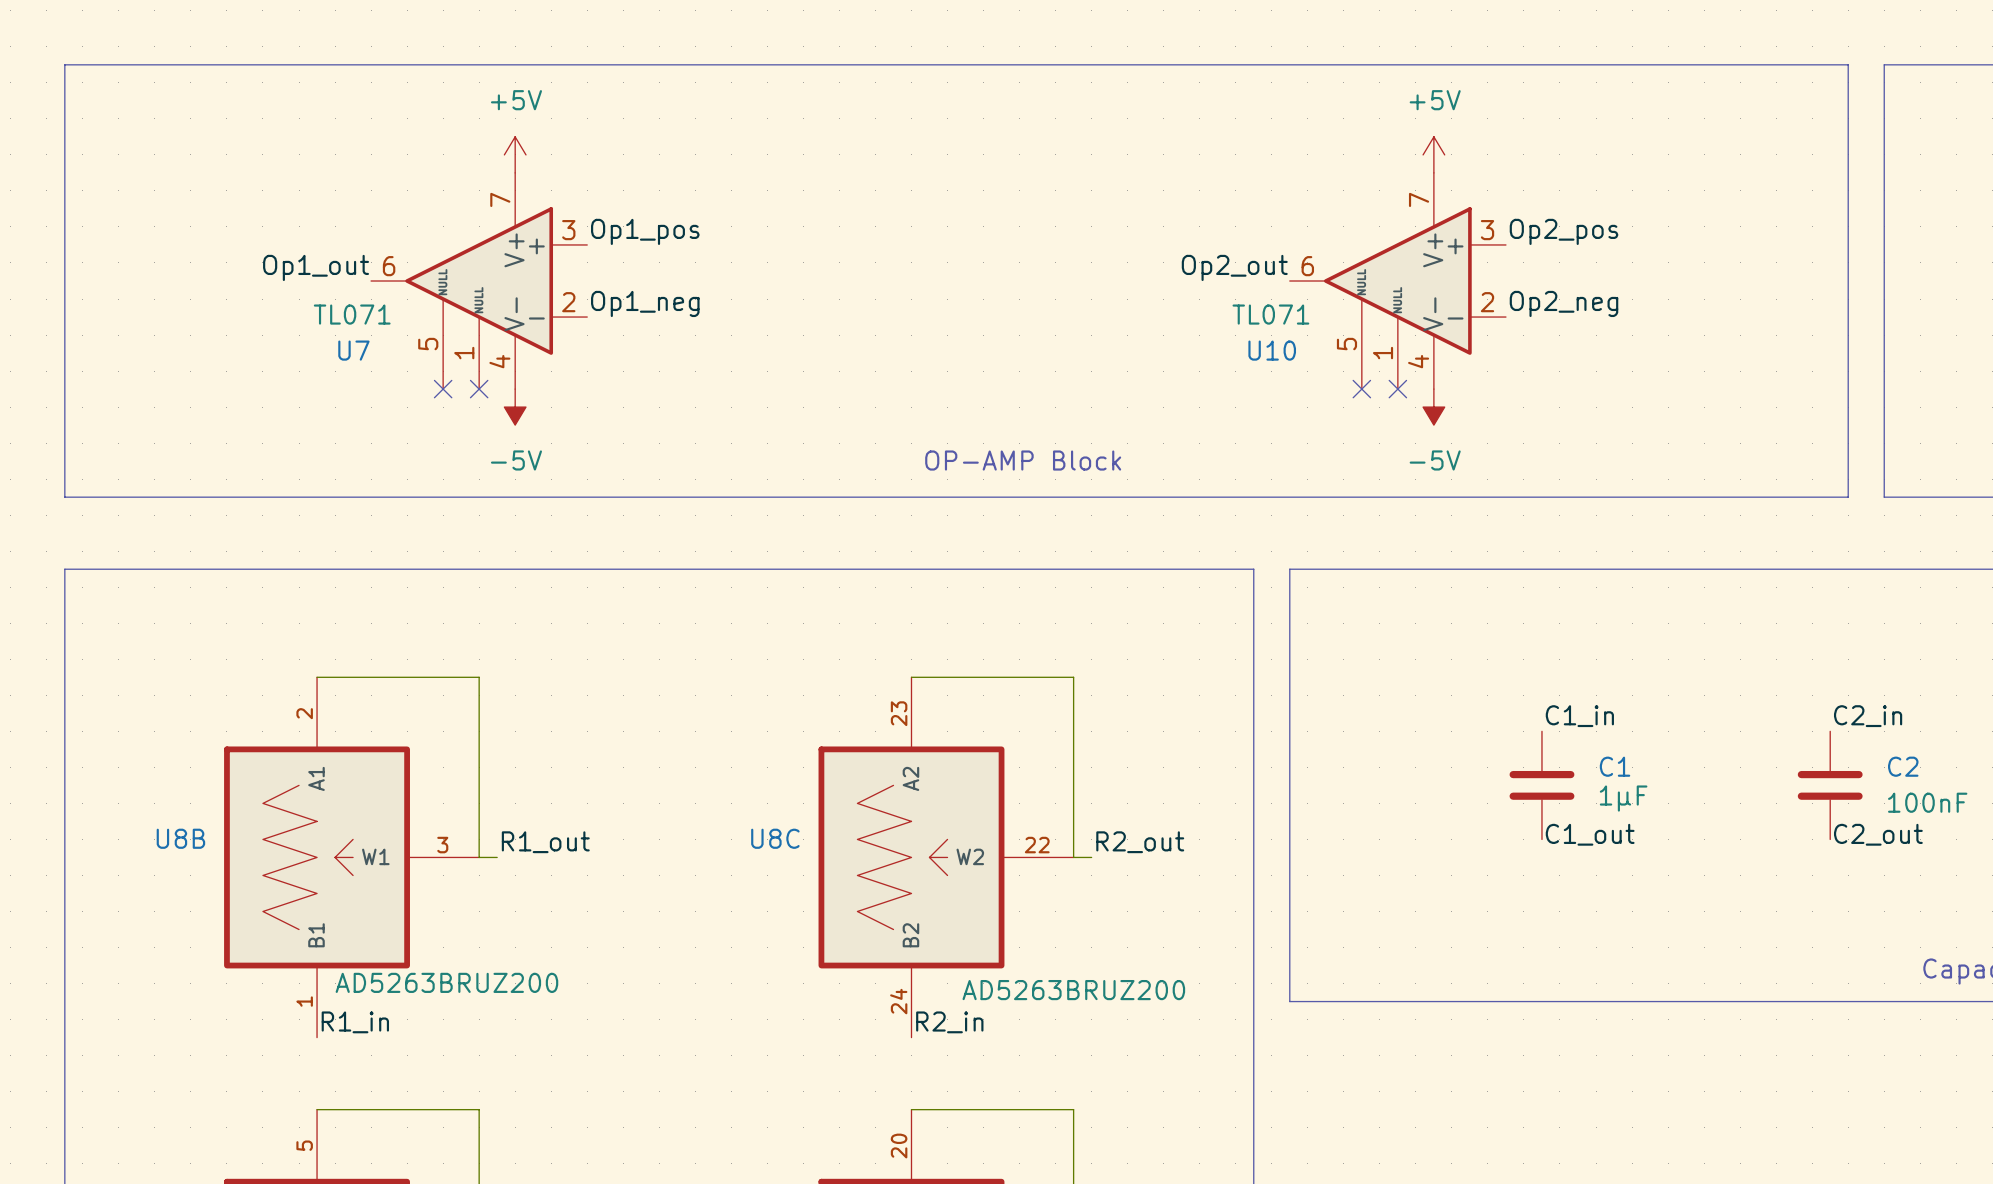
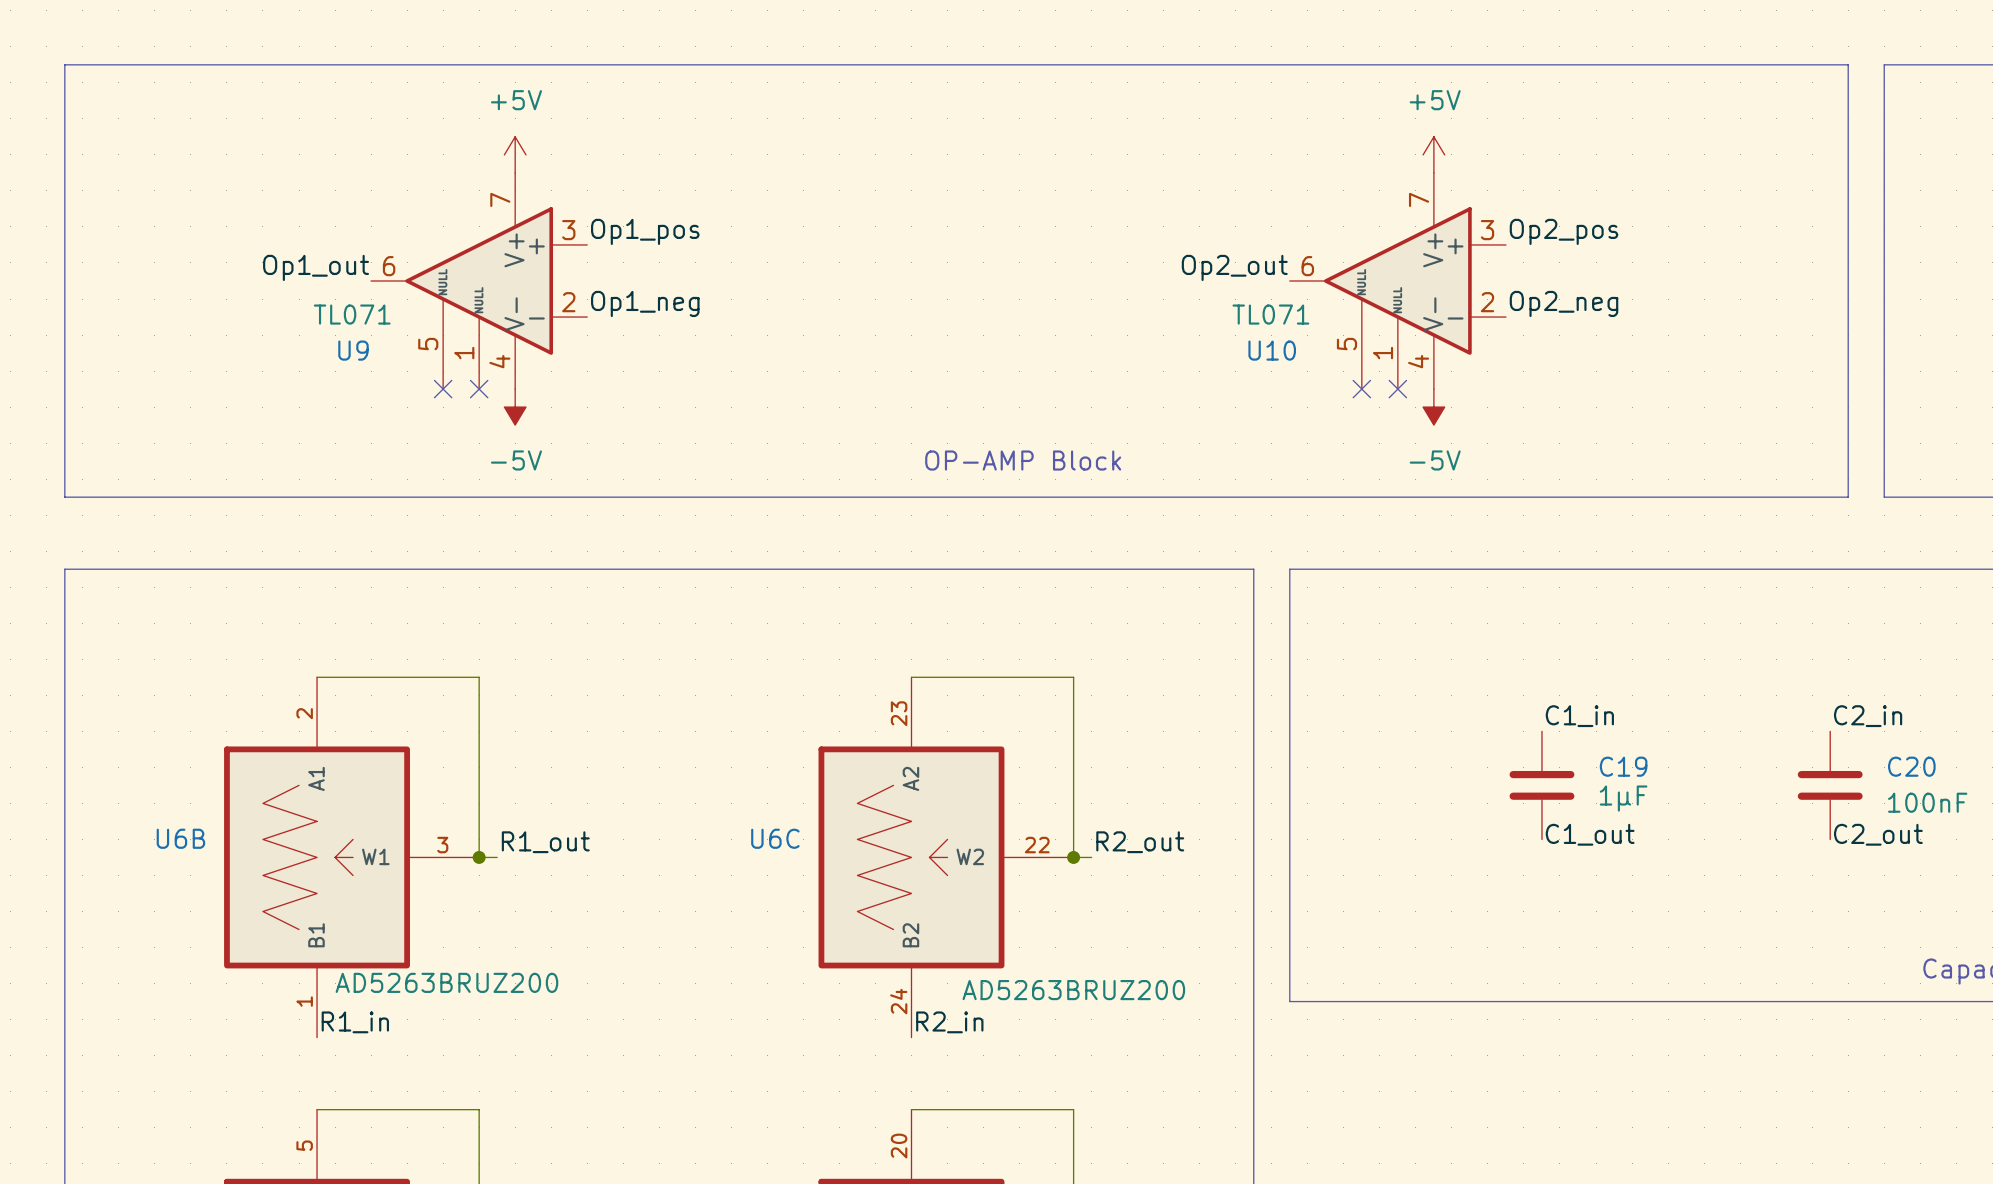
U7 name: U7 (353, 350) -> U9 (353, 350)
C1 name: C1 (1615, 766) -> C19 (1623, 766)
C2 name: C2 (1903, 766) -> C20 (1911, 766)
U8B name: U8B (180, 838) -> U6B (180, 838)
U8C name: U8C (775, 838) -> U6C (775, 838)
junction: none -> (479, 857)
junction: none -> (1073, 857)

